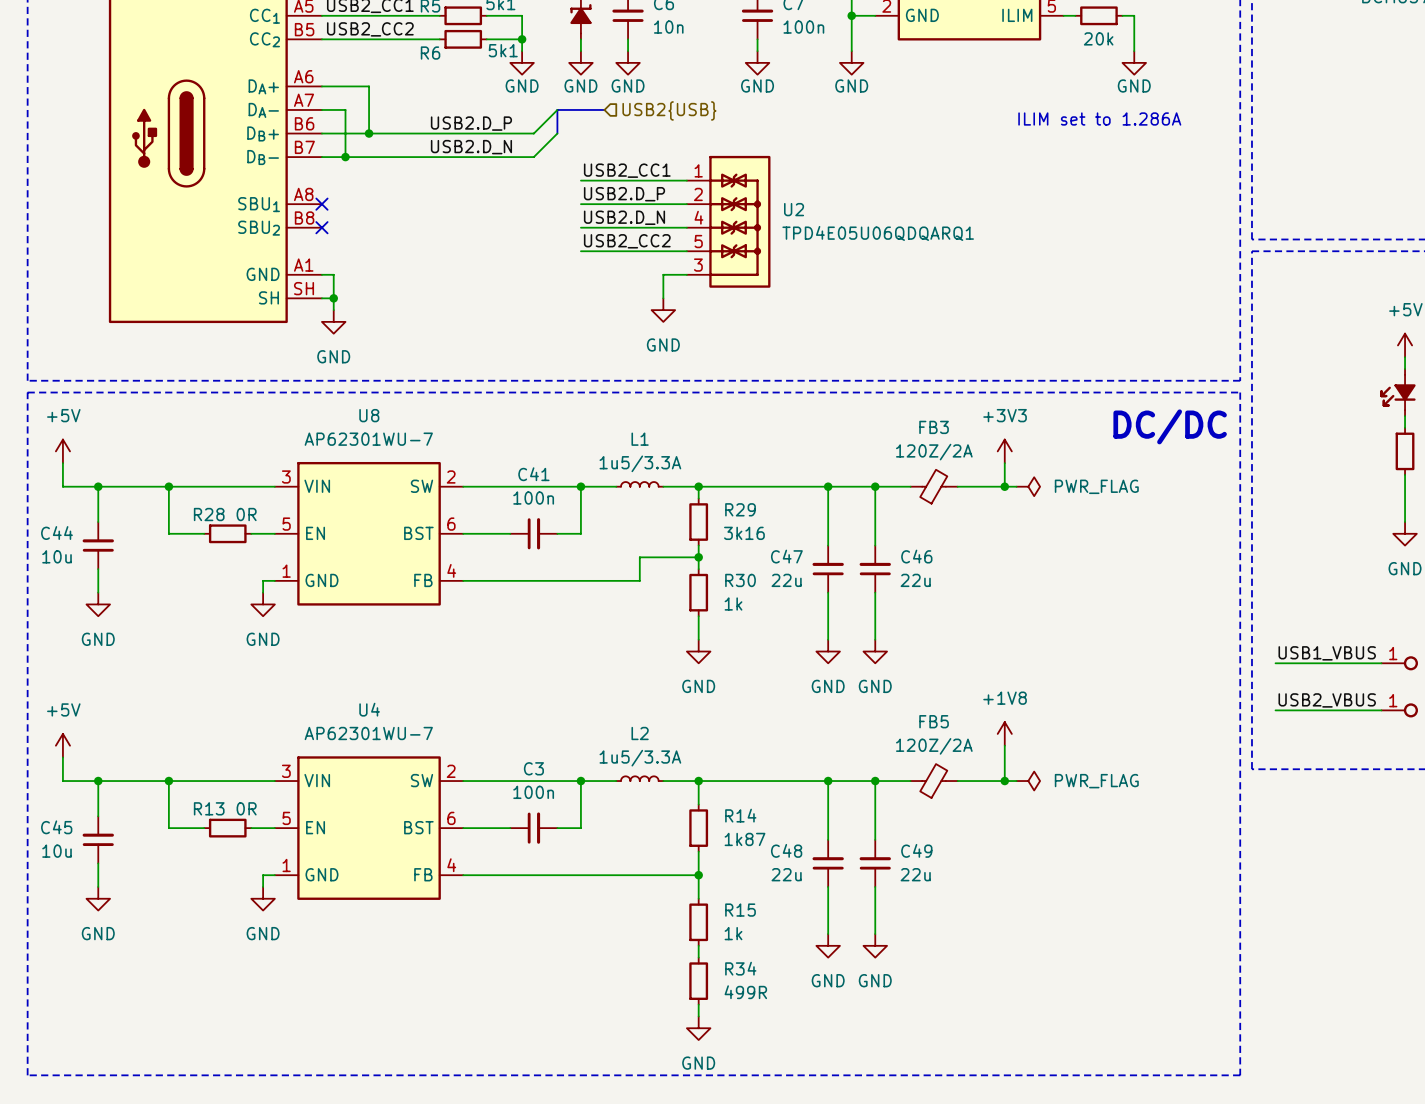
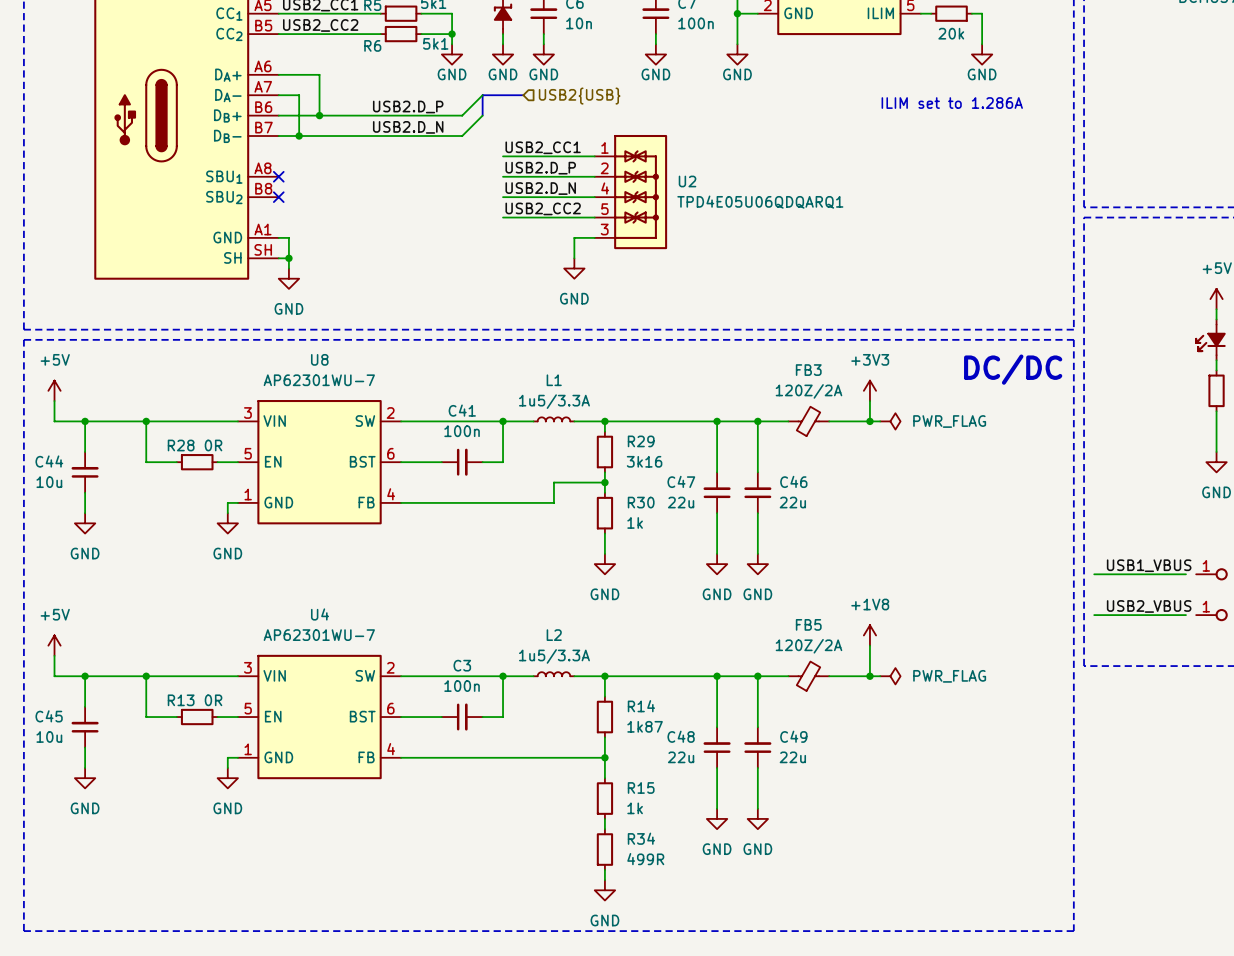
wire: (1369, 663) (1381, 663) -> (1094, 574) (1104, 574)
wire: (1369, 710) (1381, 710) -> (1094, 615) (1104, 615)

